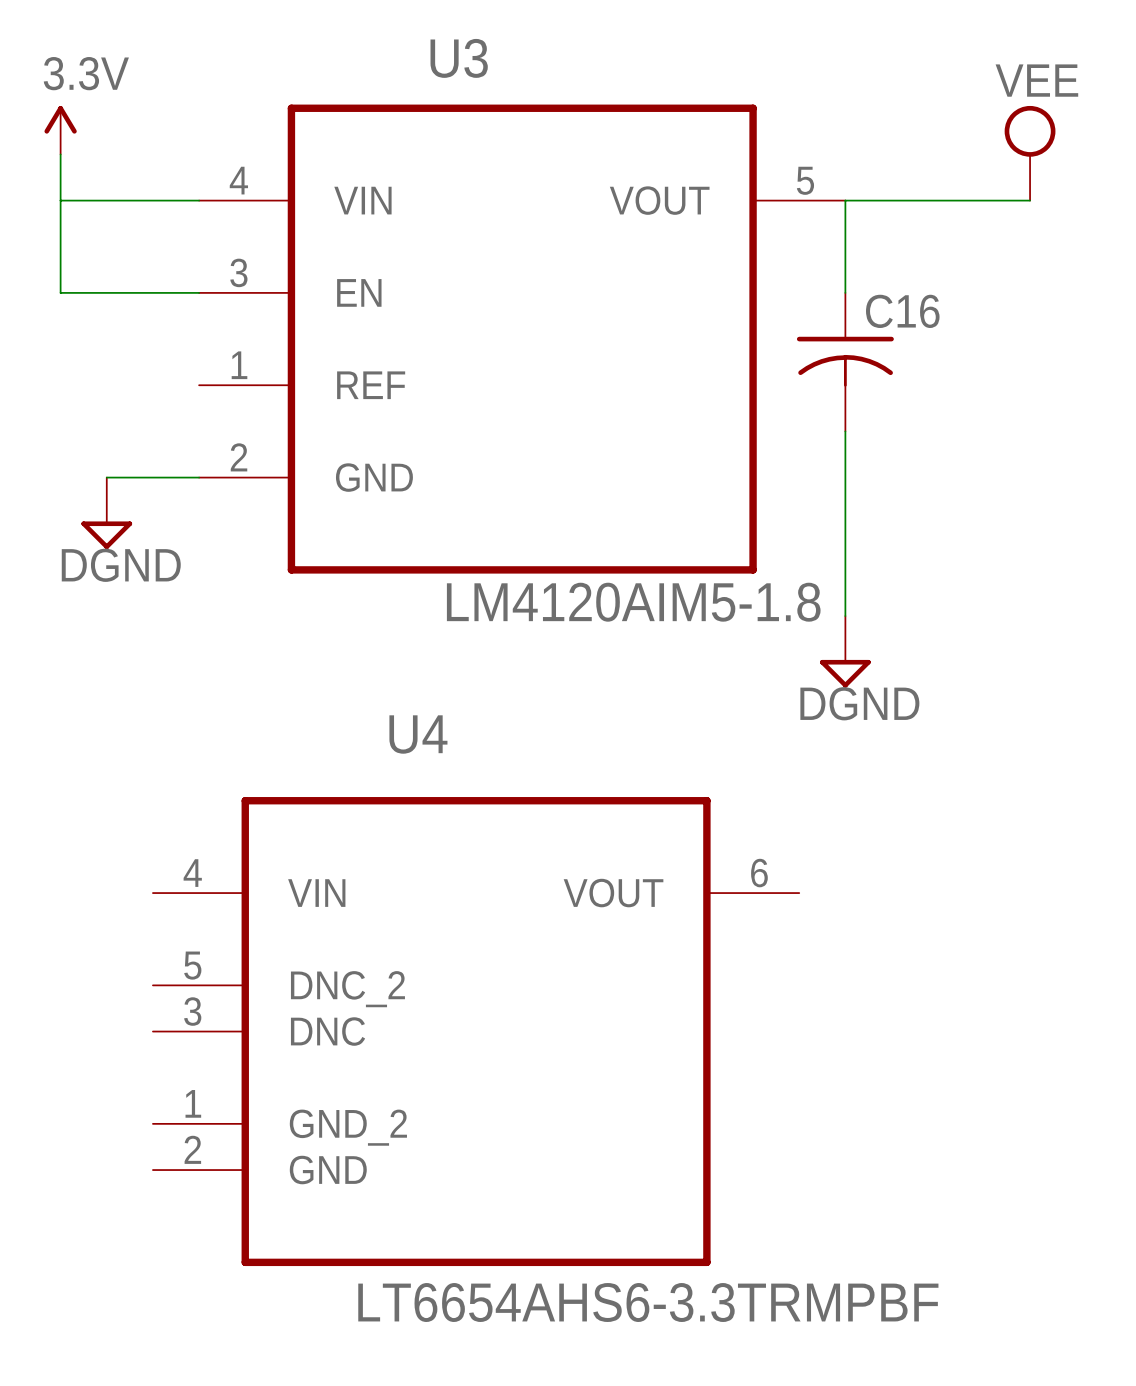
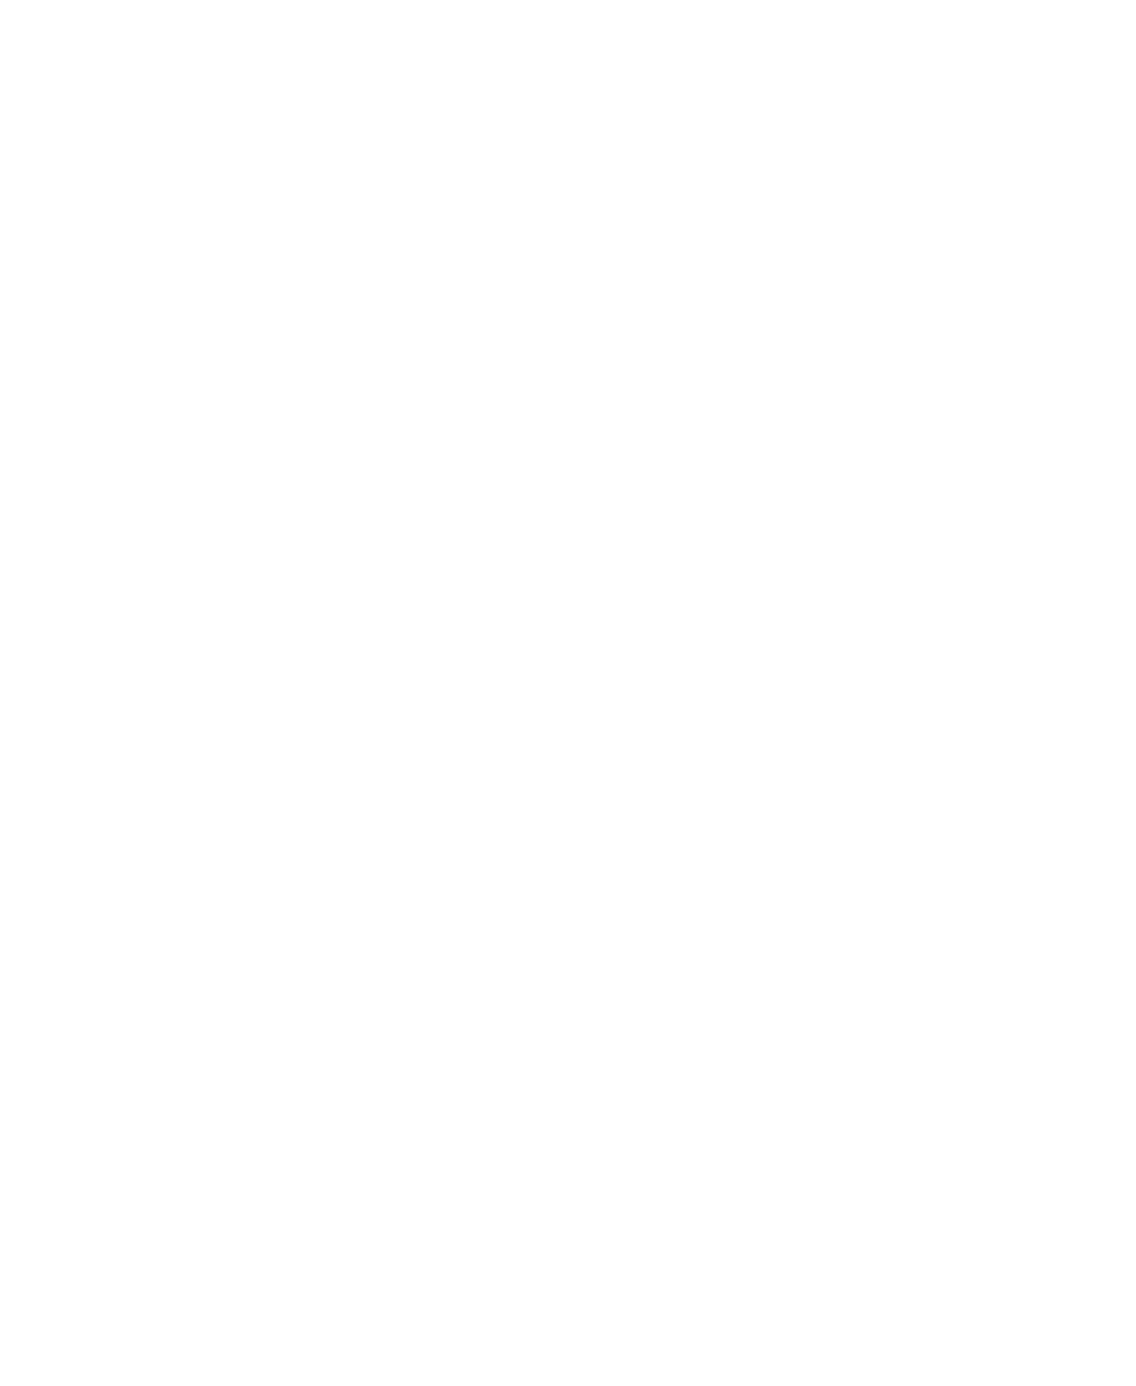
power symbol: 3.3V (60, 130) -> none
power symbol: VEE (1030, 153) -> none
wire: (60, 154) (60, 292) (199, 292) -> none
wire: (60, 200) (199, 200) -> none
wire: (1030, 200) (845, 200) (845, 292) -> none
U3: LM4120AIM5-1.8 (522, 339) -> none
C16: (845, 362) -> none
wire: (845, 431) (845, 616) -> none
wire: (106, 477) (199, 477) -> none
power symbol: DGND (106, 513) -> none
power symbol: DGND (845, 651) -> none
U4: LT6654AHS6-3.3TRMPBF (476, 1031) -> none

